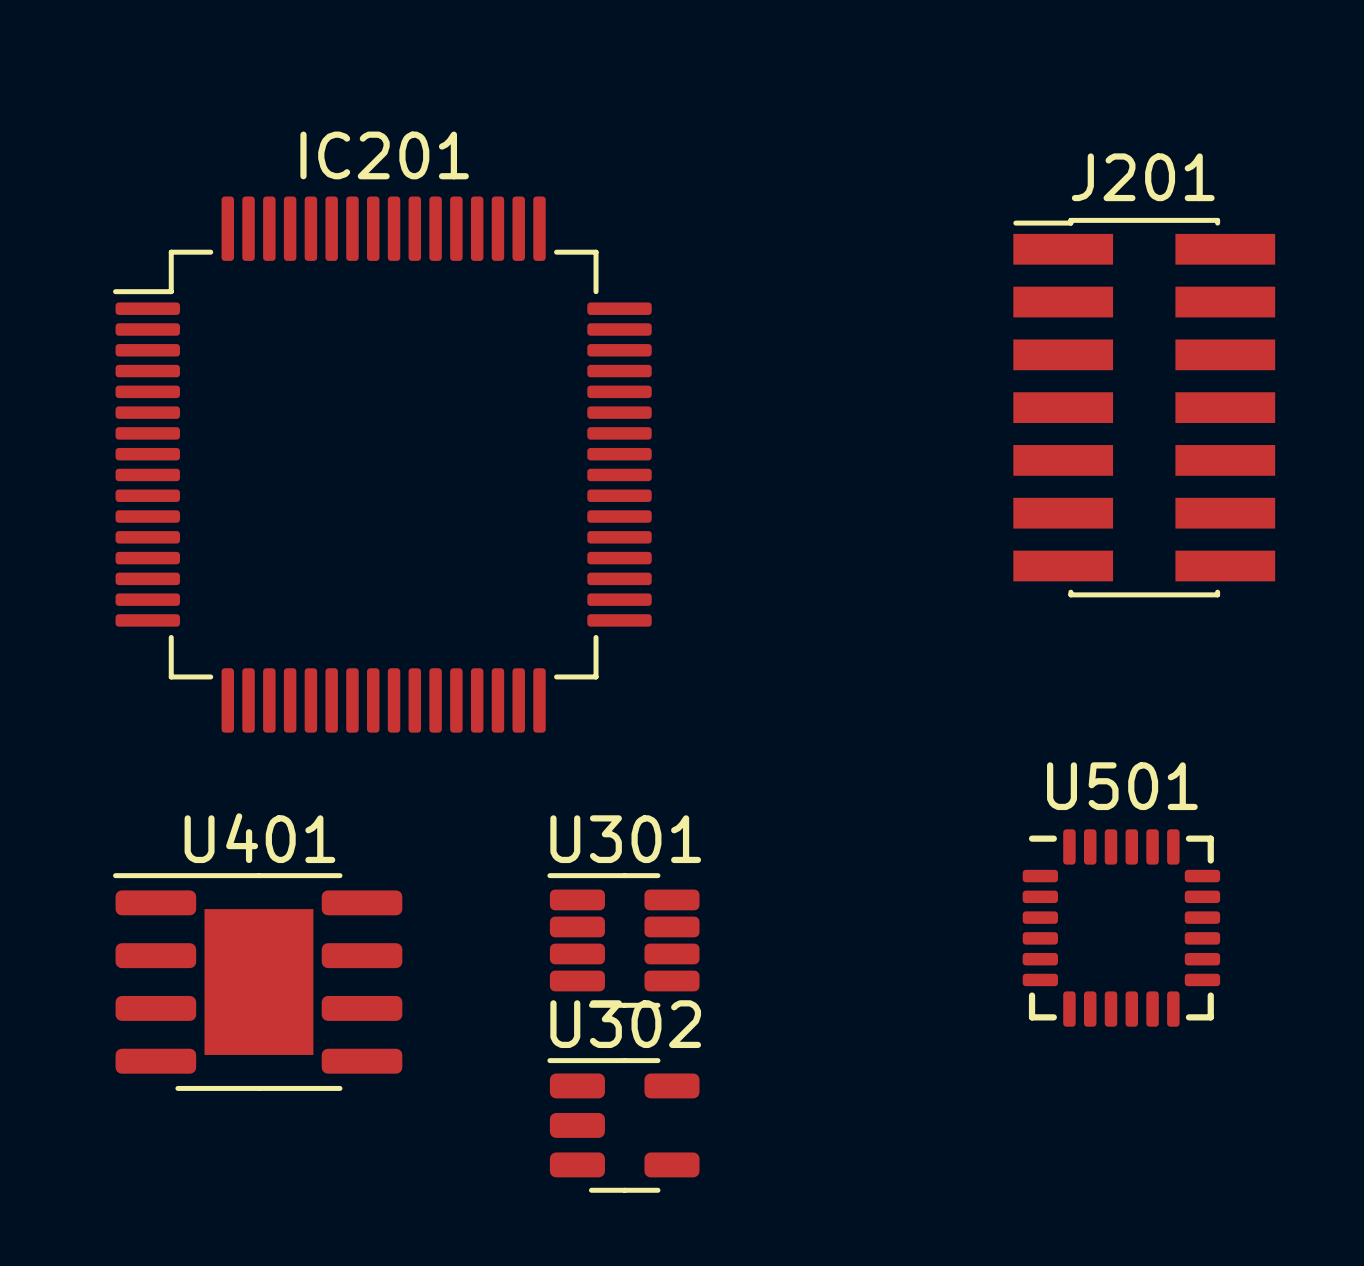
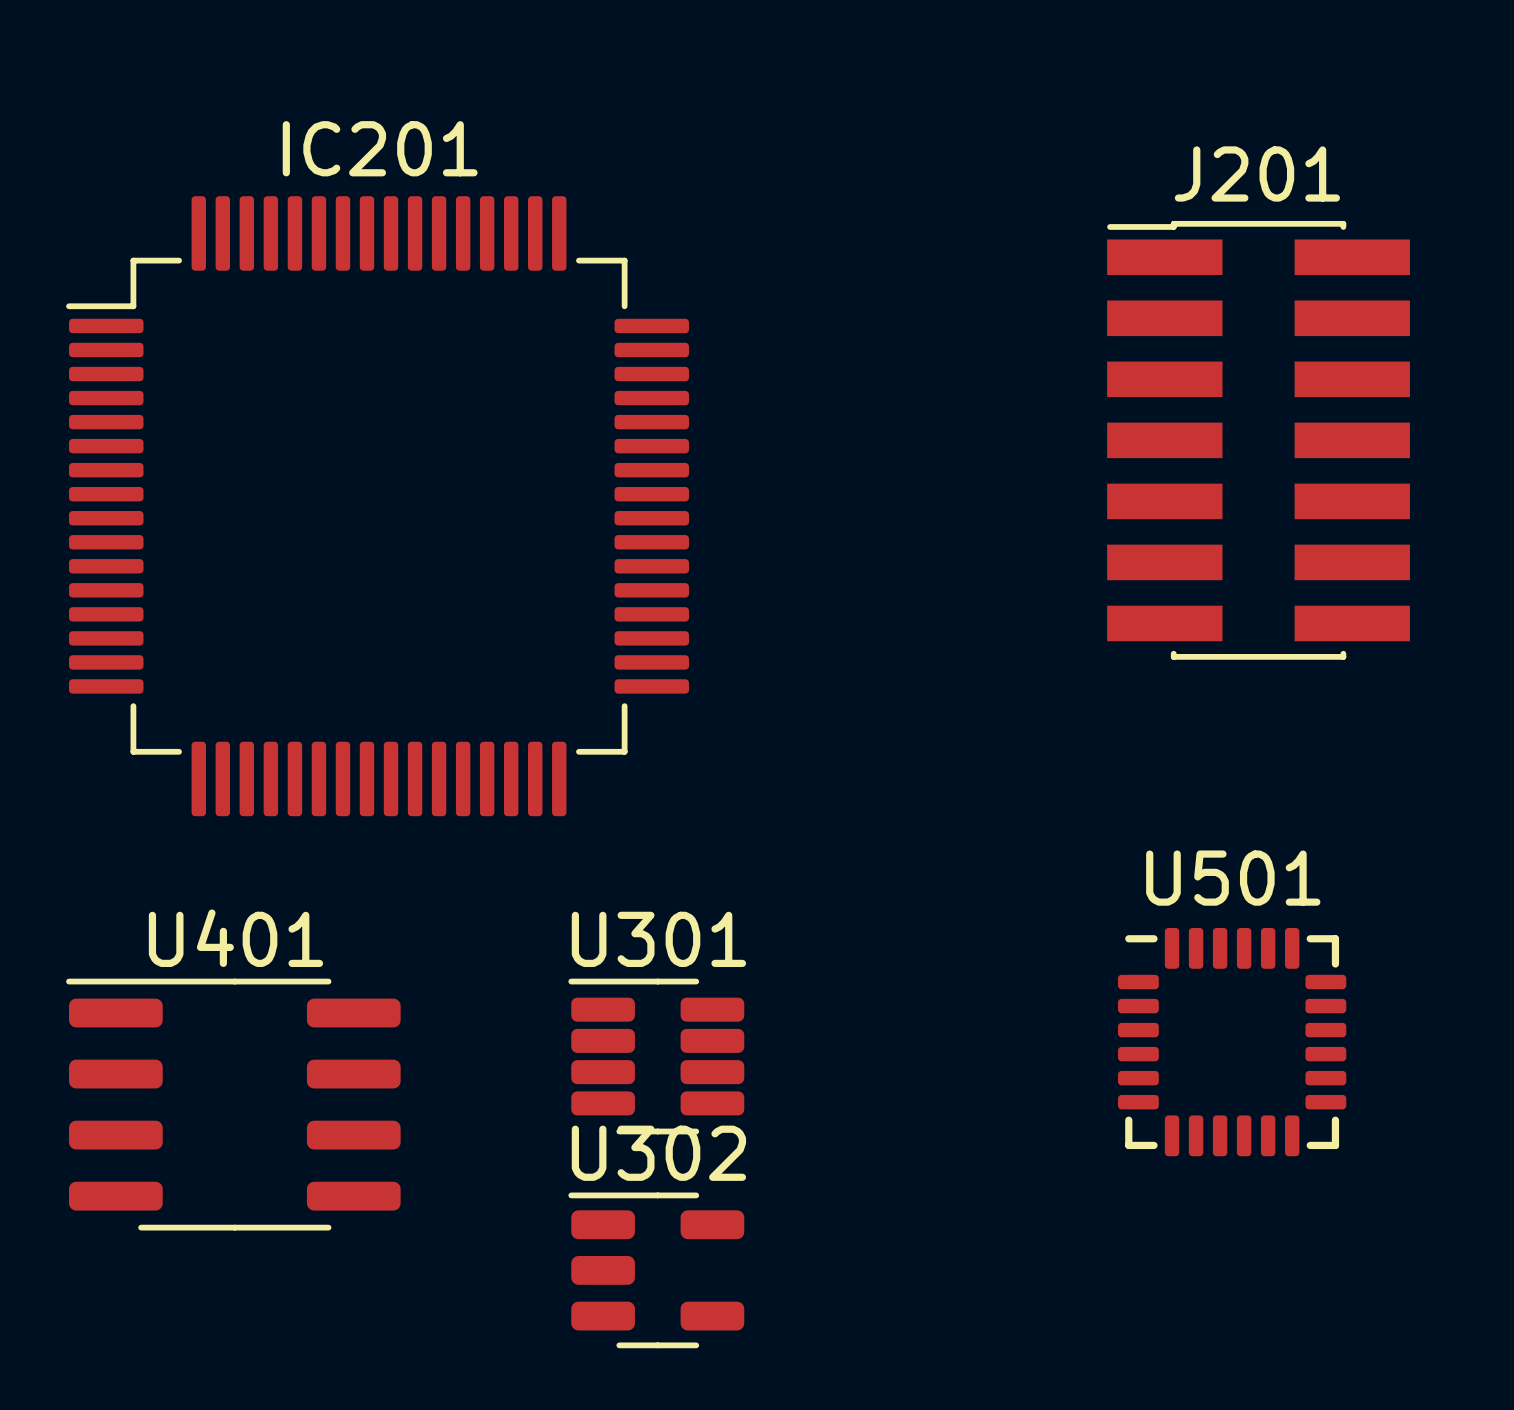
U401 footprint: [113, 873, 403, 1091] -> [66, 978, 401, 1231]

